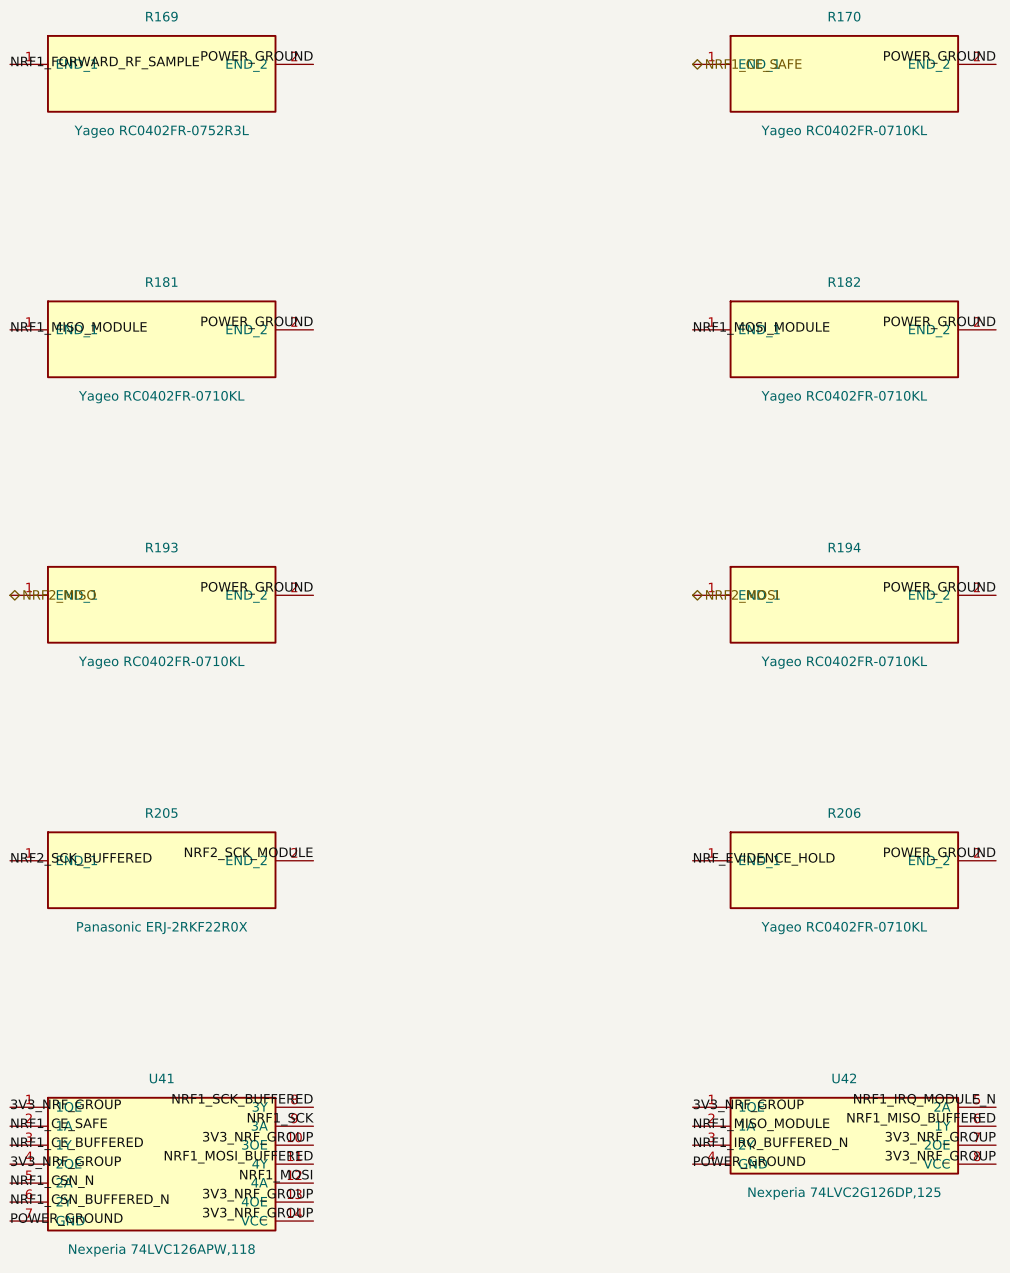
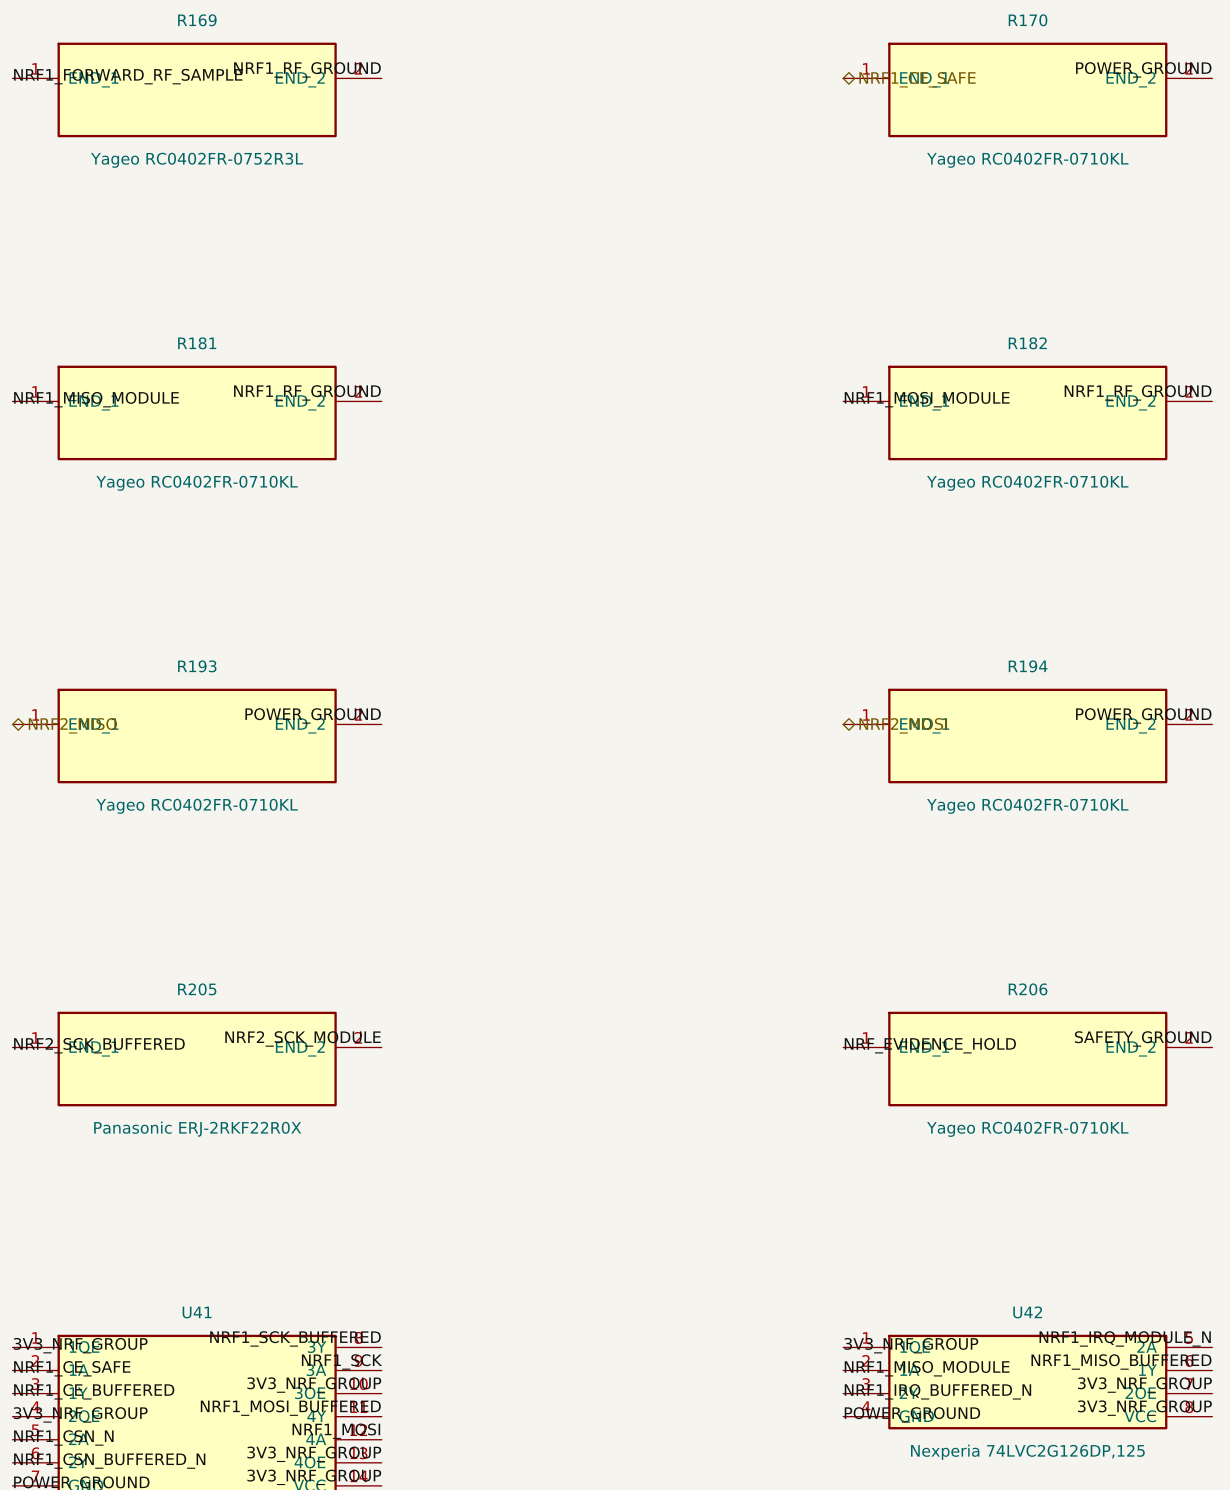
label: POWER_GROUND (257, 57) -> NRF1_RF_GROUND (307, 69)
label: POWER_GROUND (257, 322) -> NRF1_RF_GROUND (307, 392)
label: POWER_GROUND (939, 322) -> NRF1_RF_GROUND (1138, 392)
label: POWER_GROUND (939, 853) -> SAFETY_GROUND (1143, 1038)

